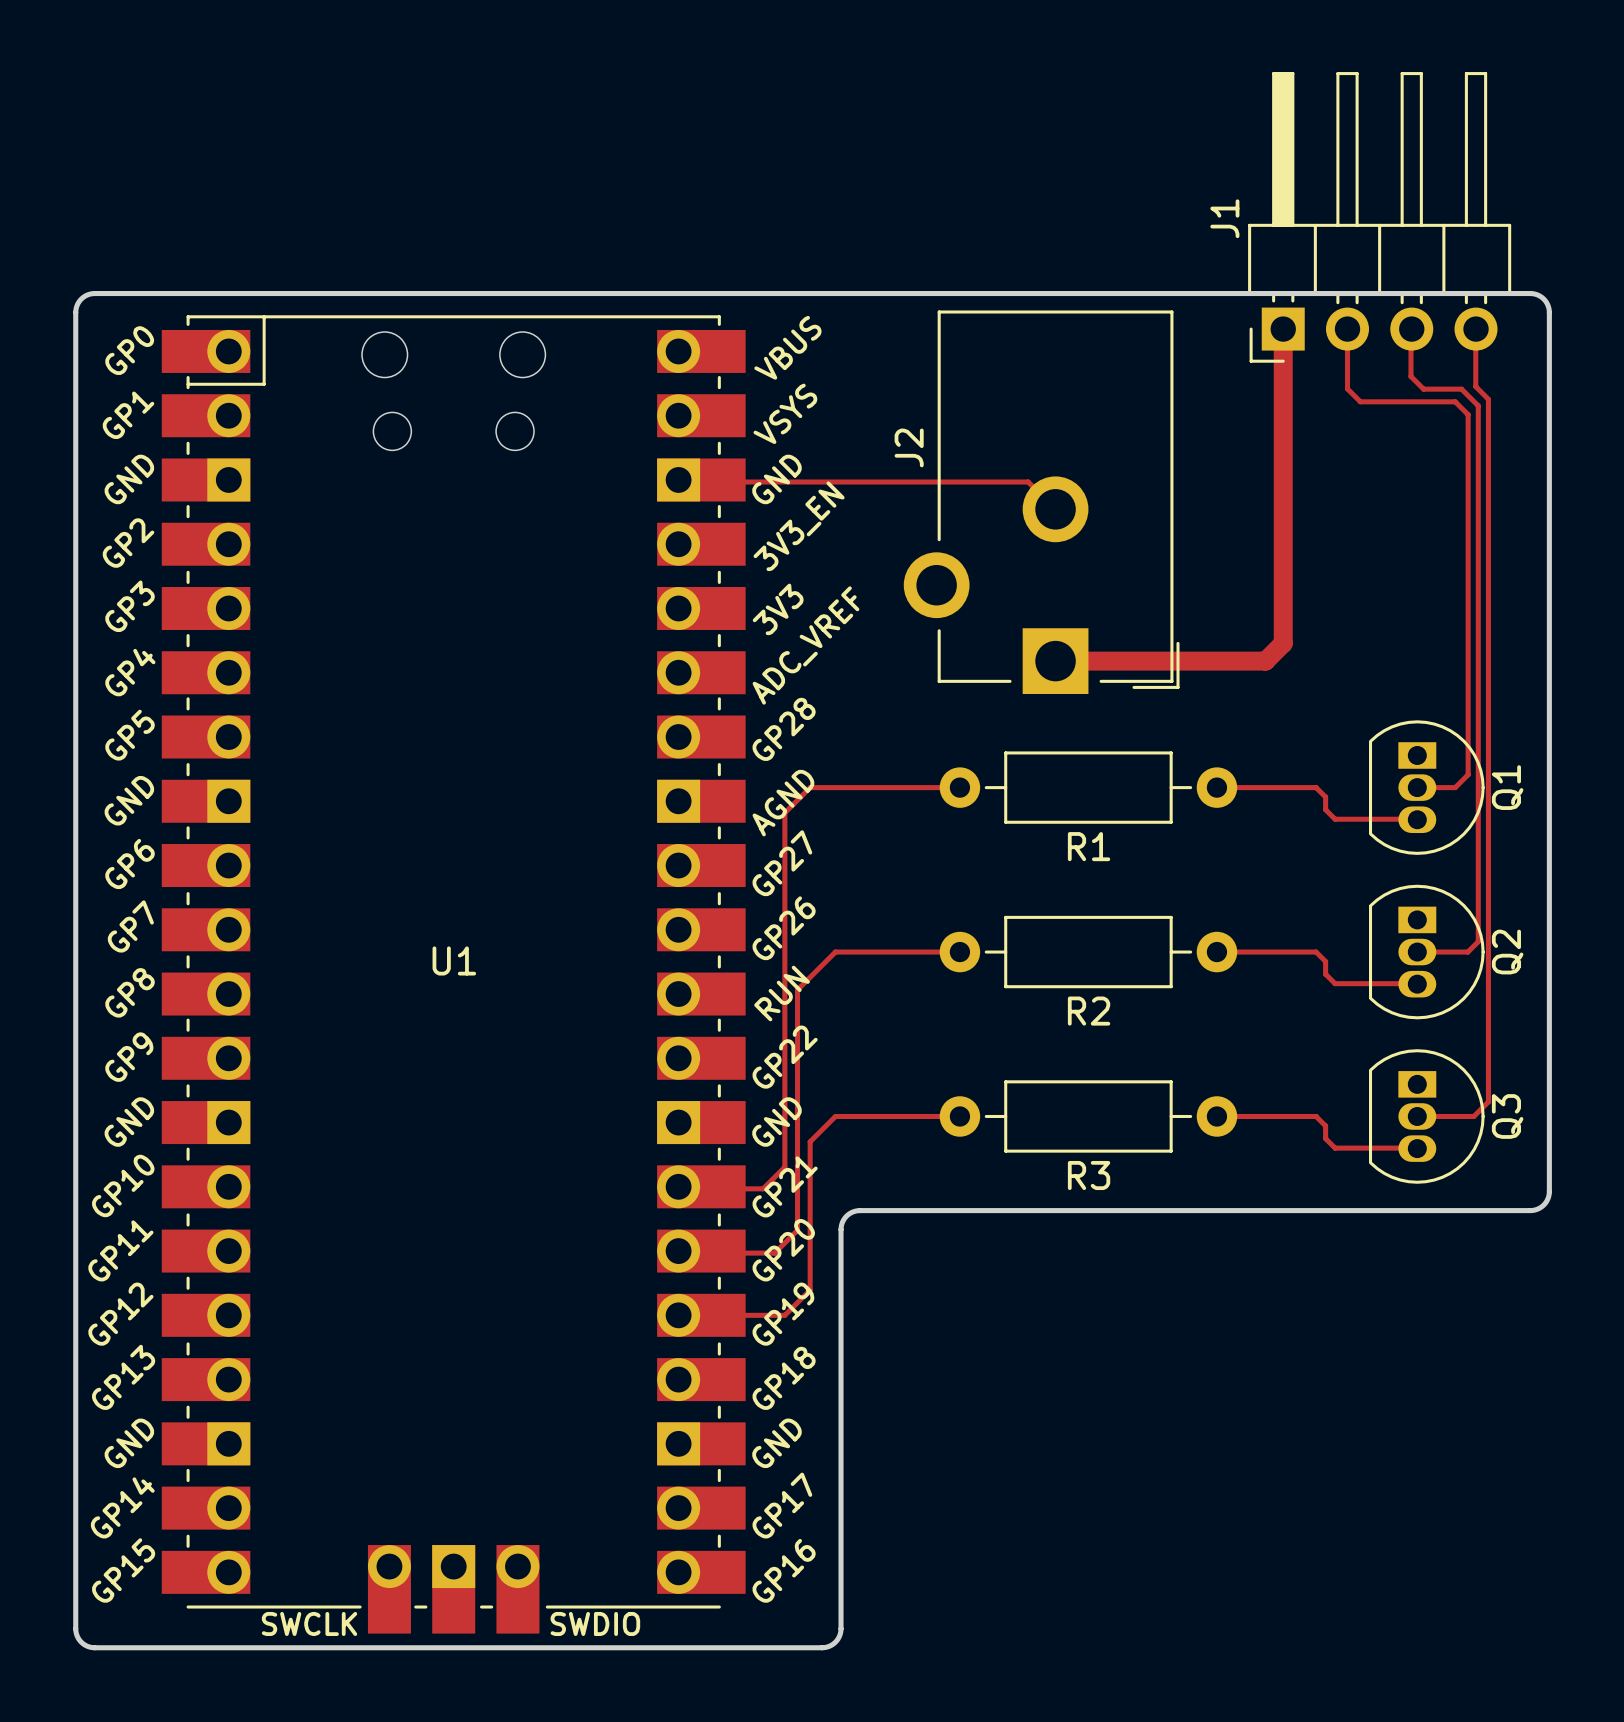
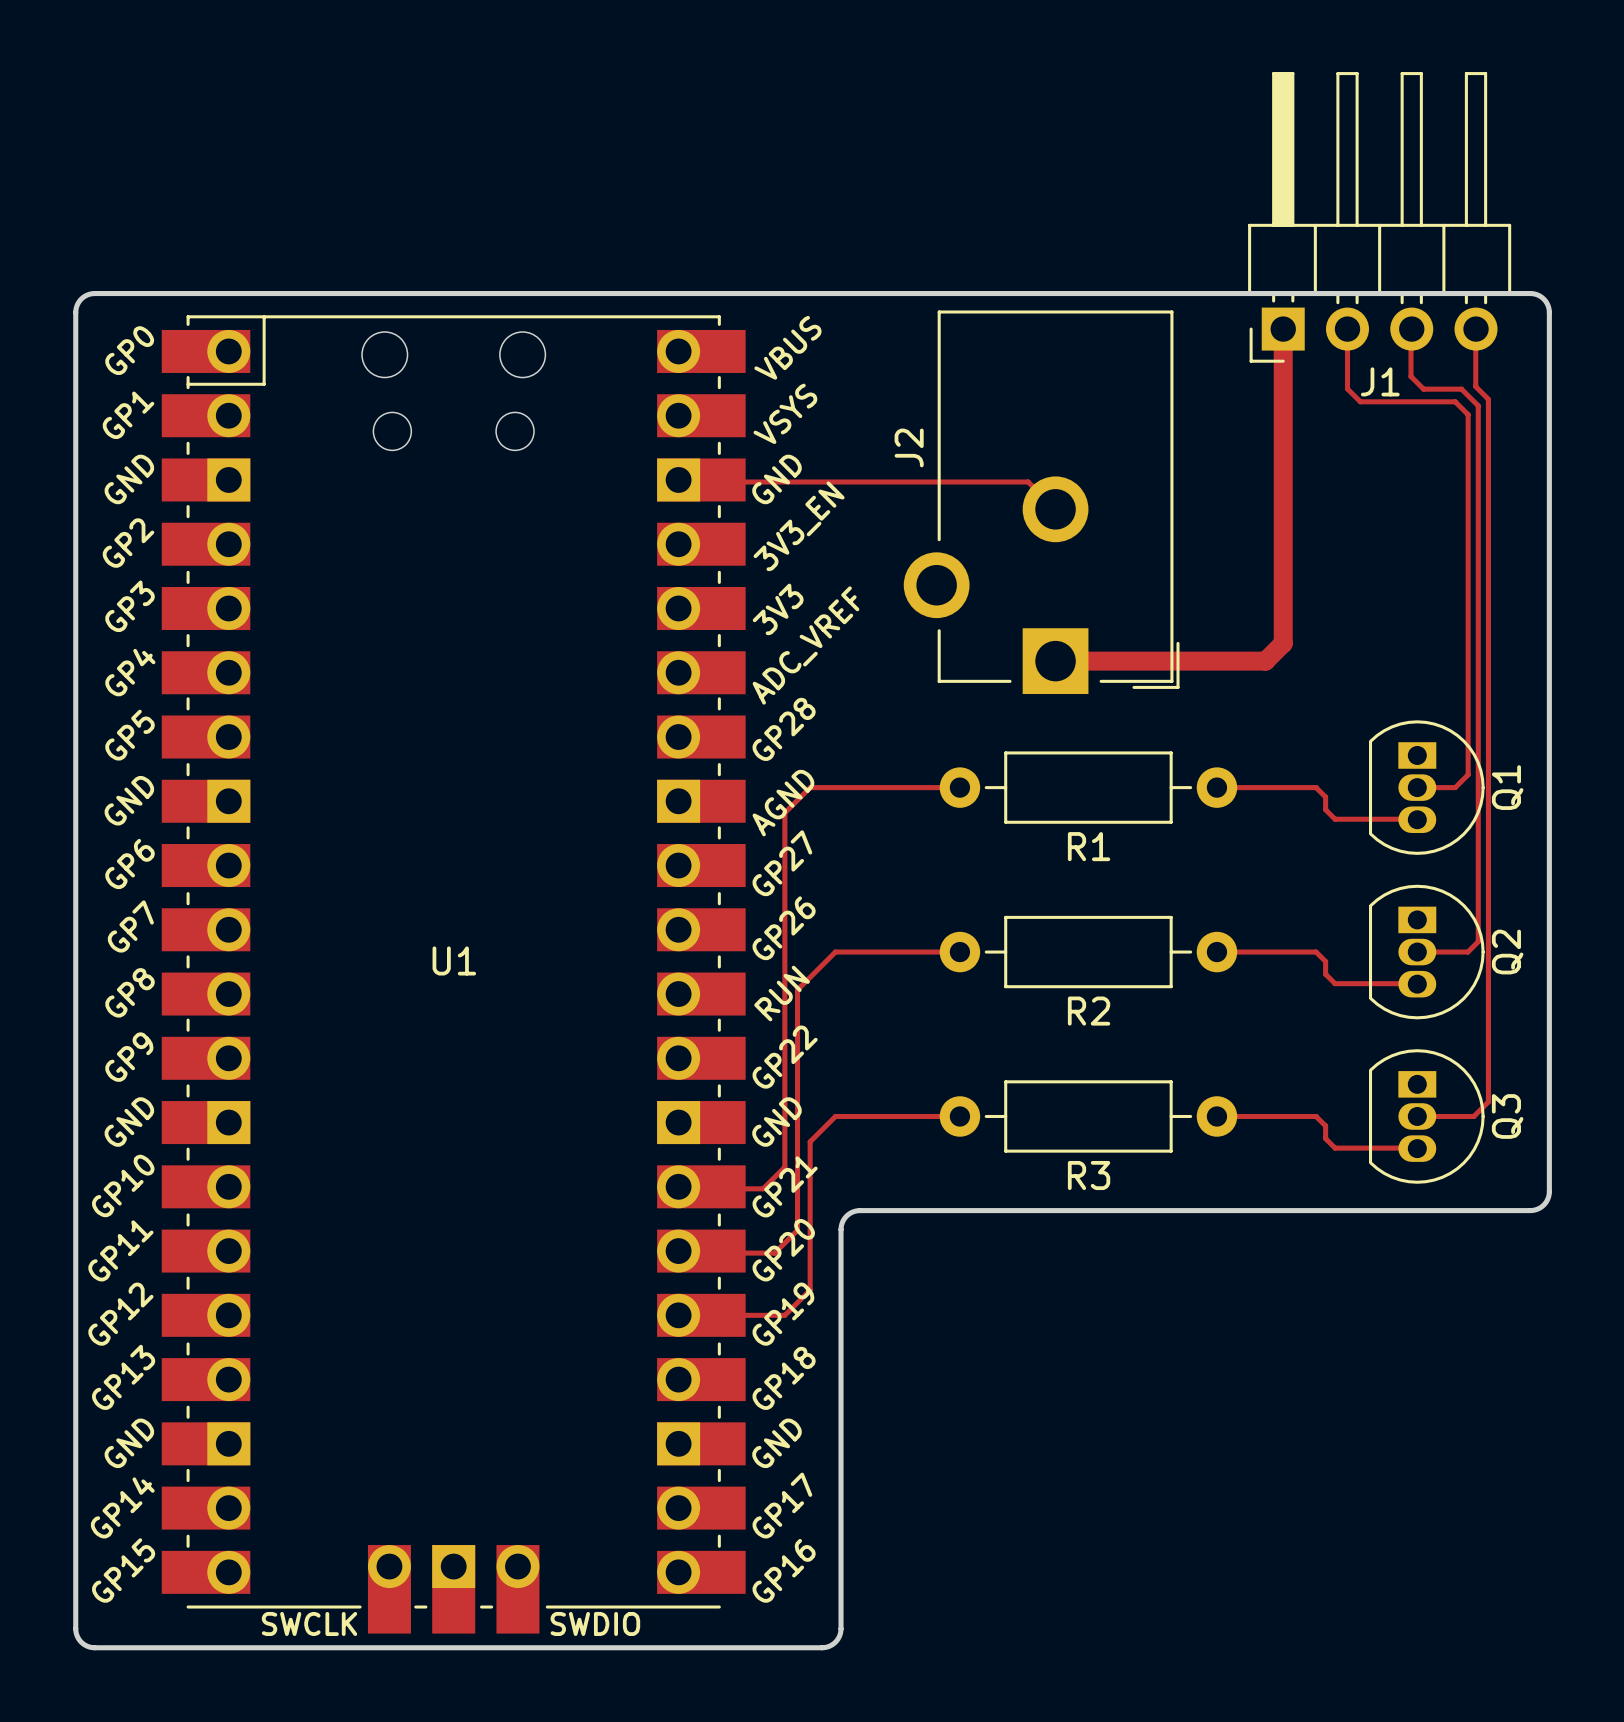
J1 name rotation: 0° (1224, 218) -> 90° clockwise (1380, 381)
J1 name position: J1 (1224, 218) -> J1 (1380, 381)

